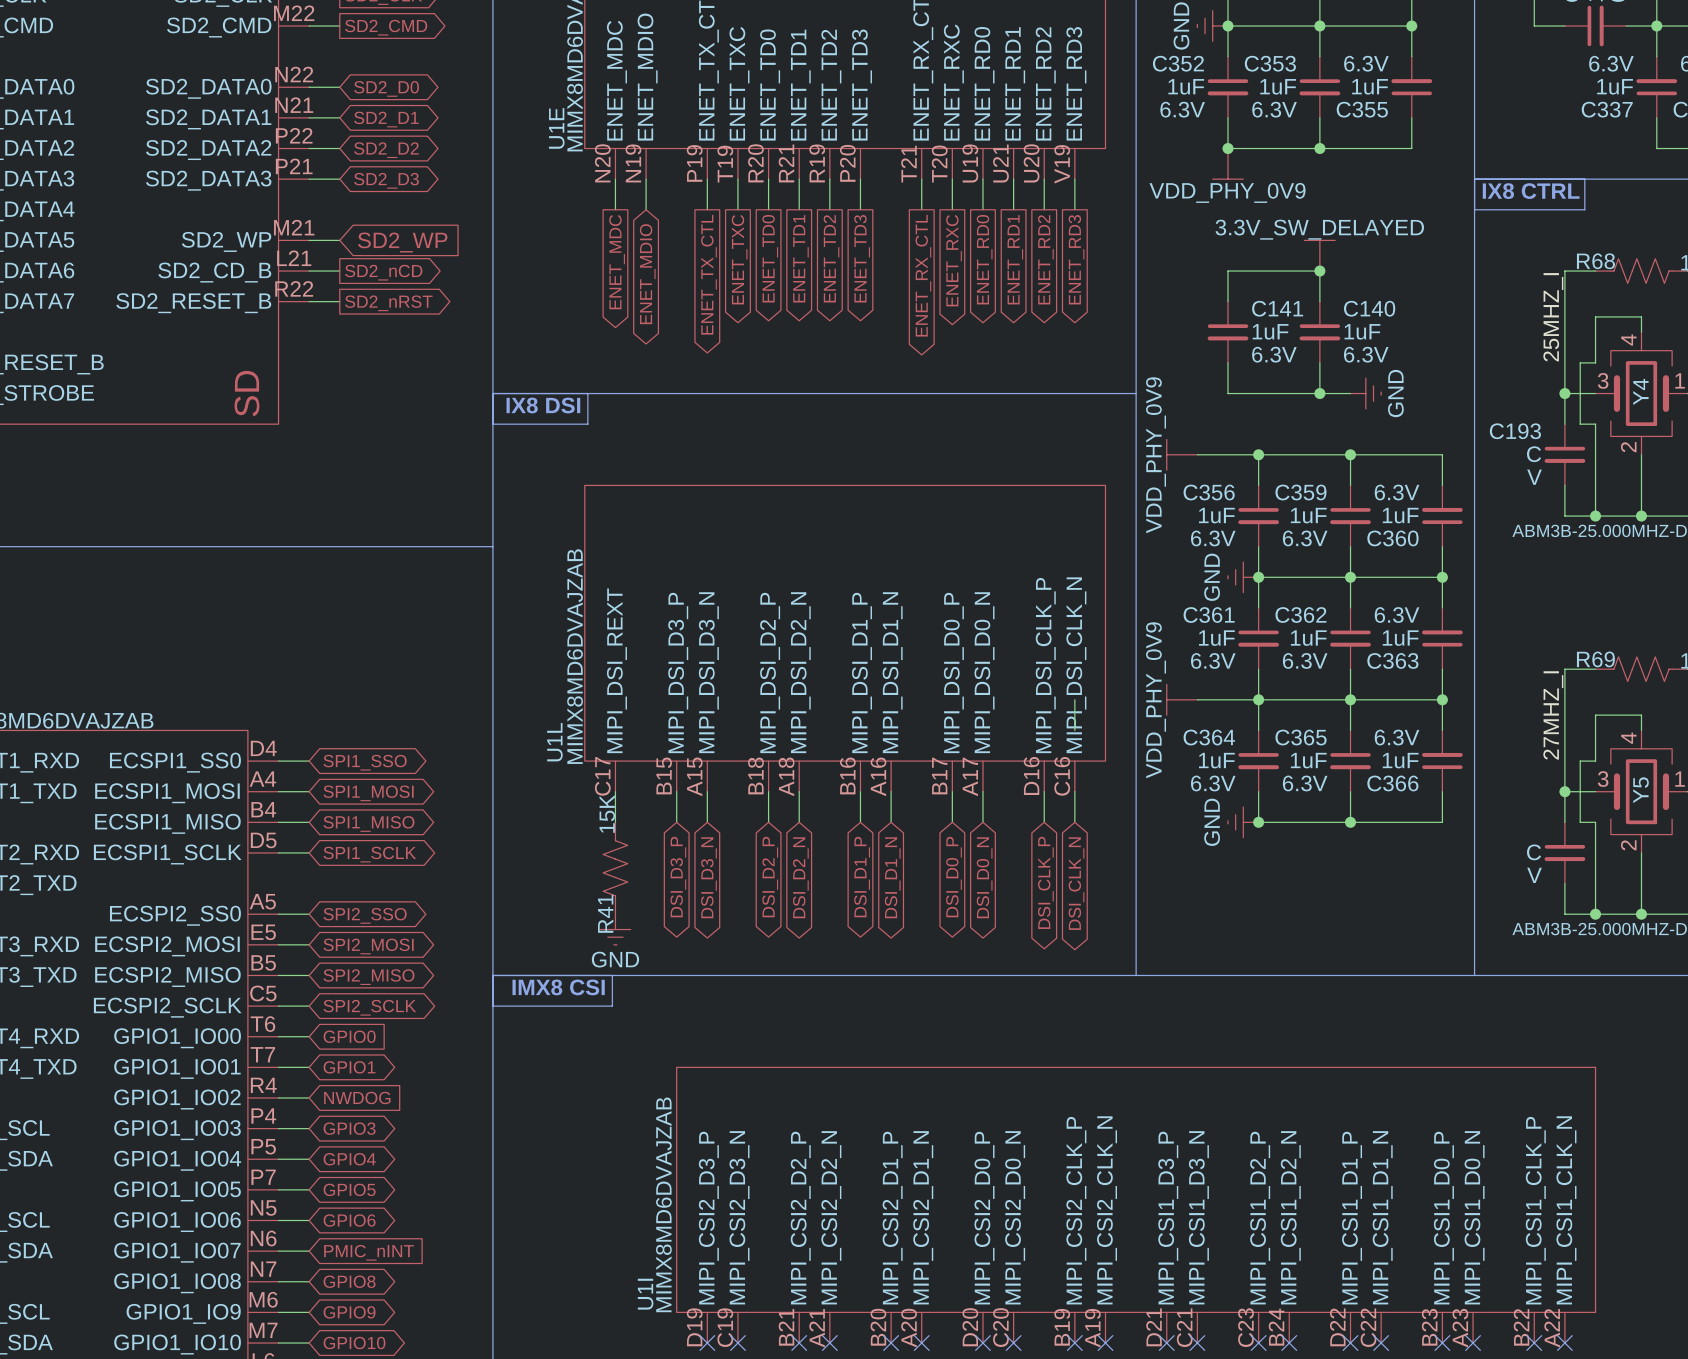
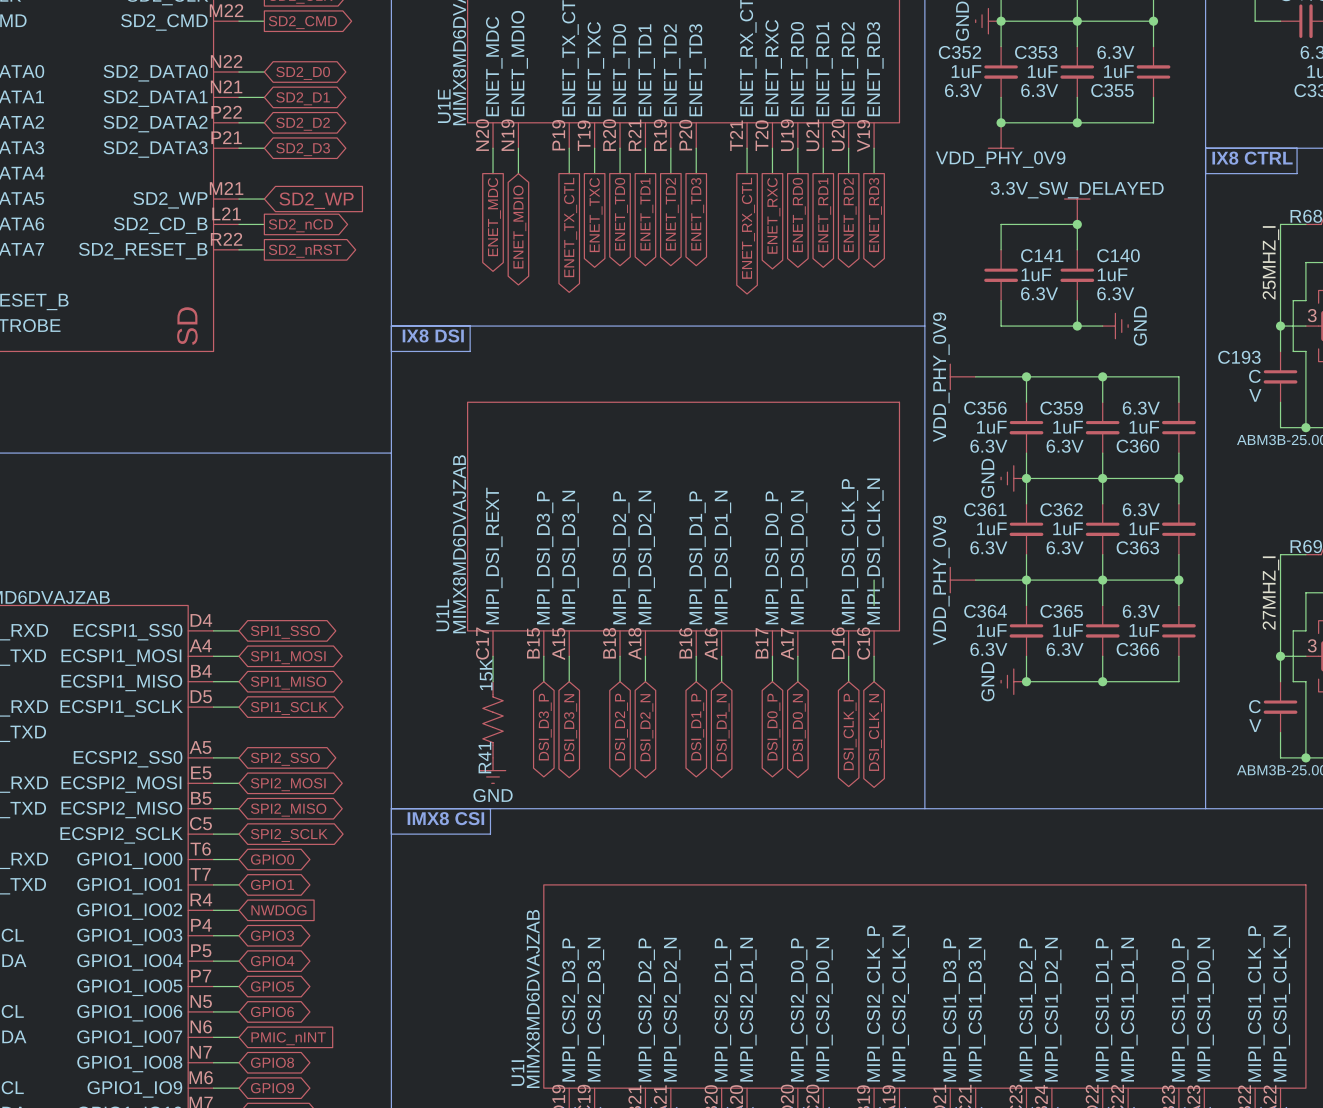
global label shape: input (349, 1036) -> bidirectional (272, 859)

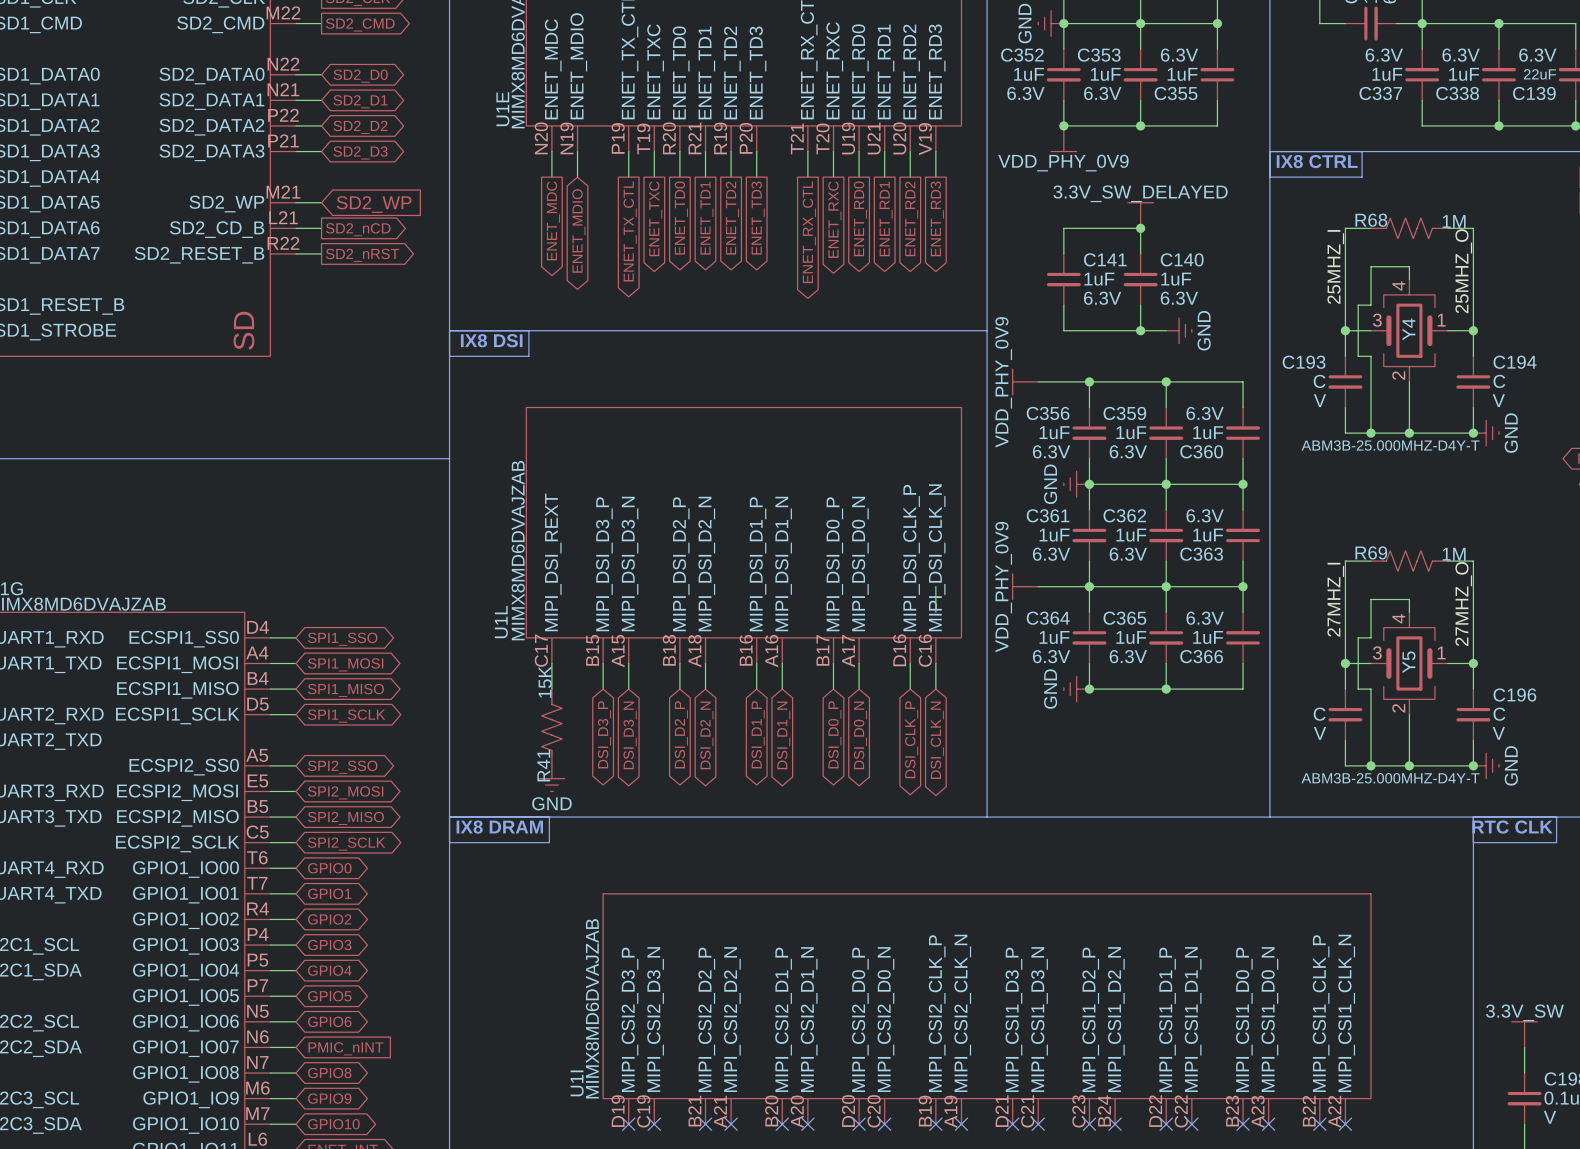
text: IMX8 CSI (445, 818) -> IX8 DRAM (499, 827)
global label shape: input (278, 910) -> bidirectional (329, 919)
global label: NWDOG (278, 910) -> GPIO2 (329, 919)

